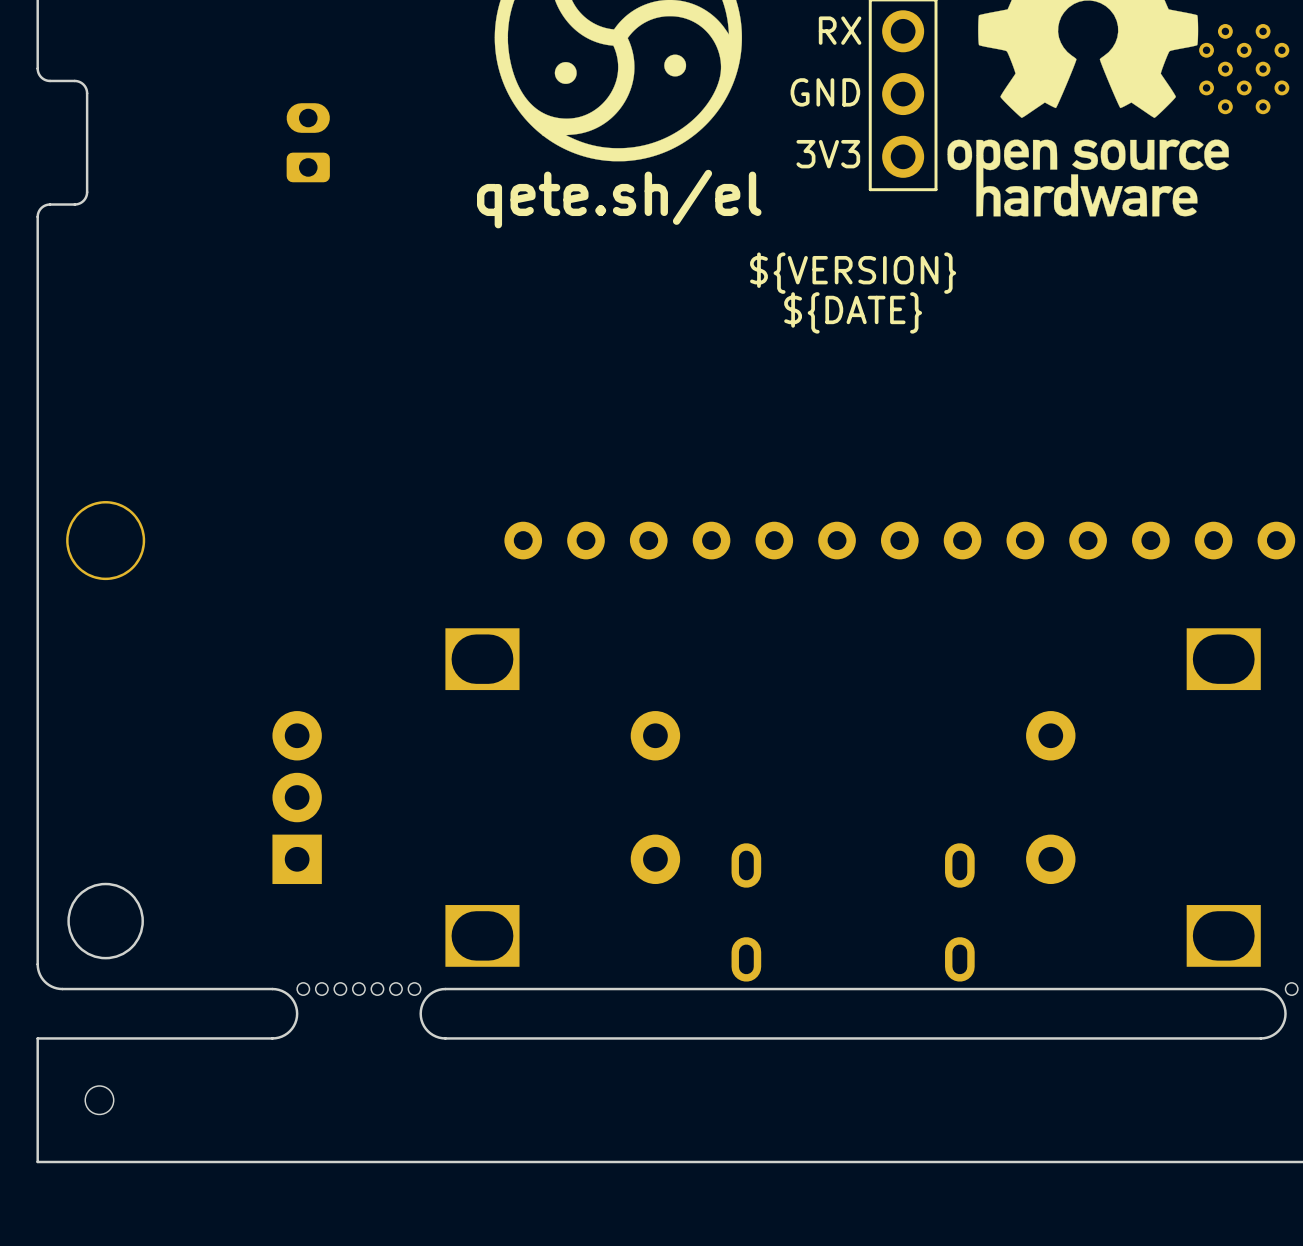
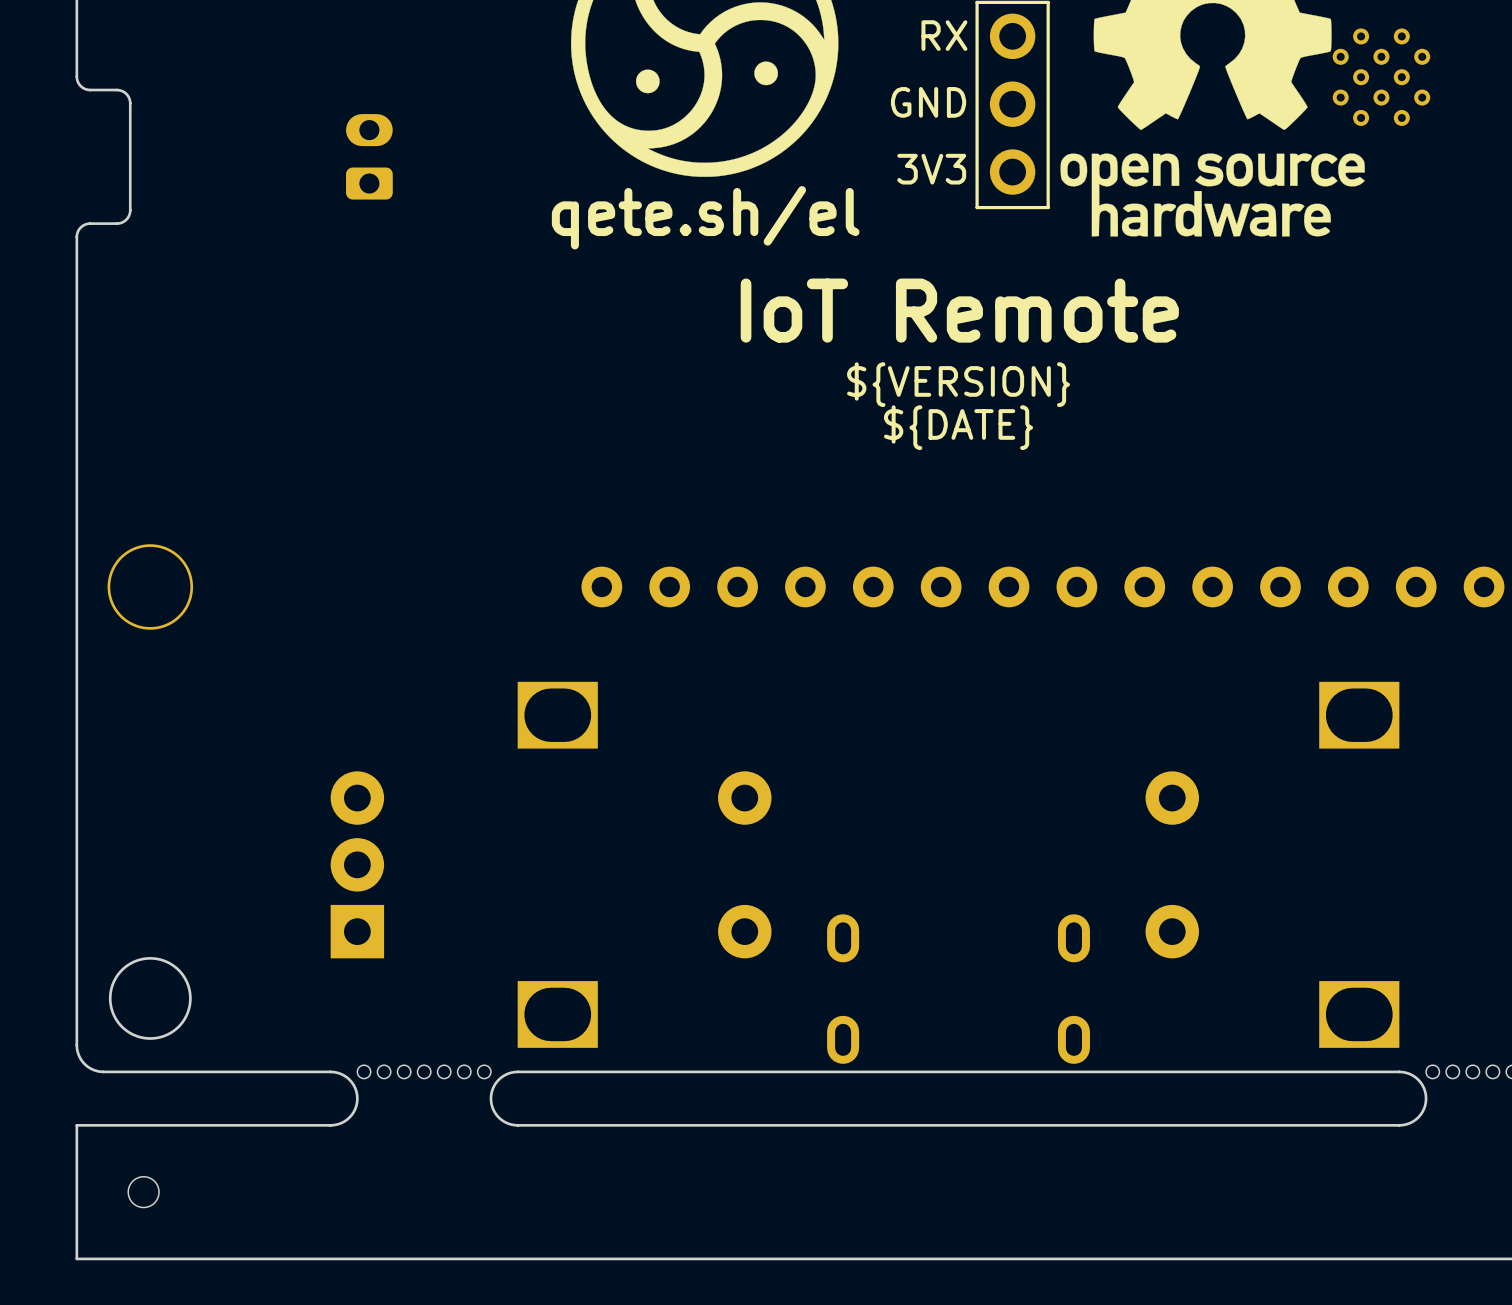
text position: ${VERSION} (853, 273) -> ${VERSION} (958, 384)
text: ${DATE} (853, 312) -> IoT Remote (959, 310)
text: none -> ${DATE} (958, 427)

